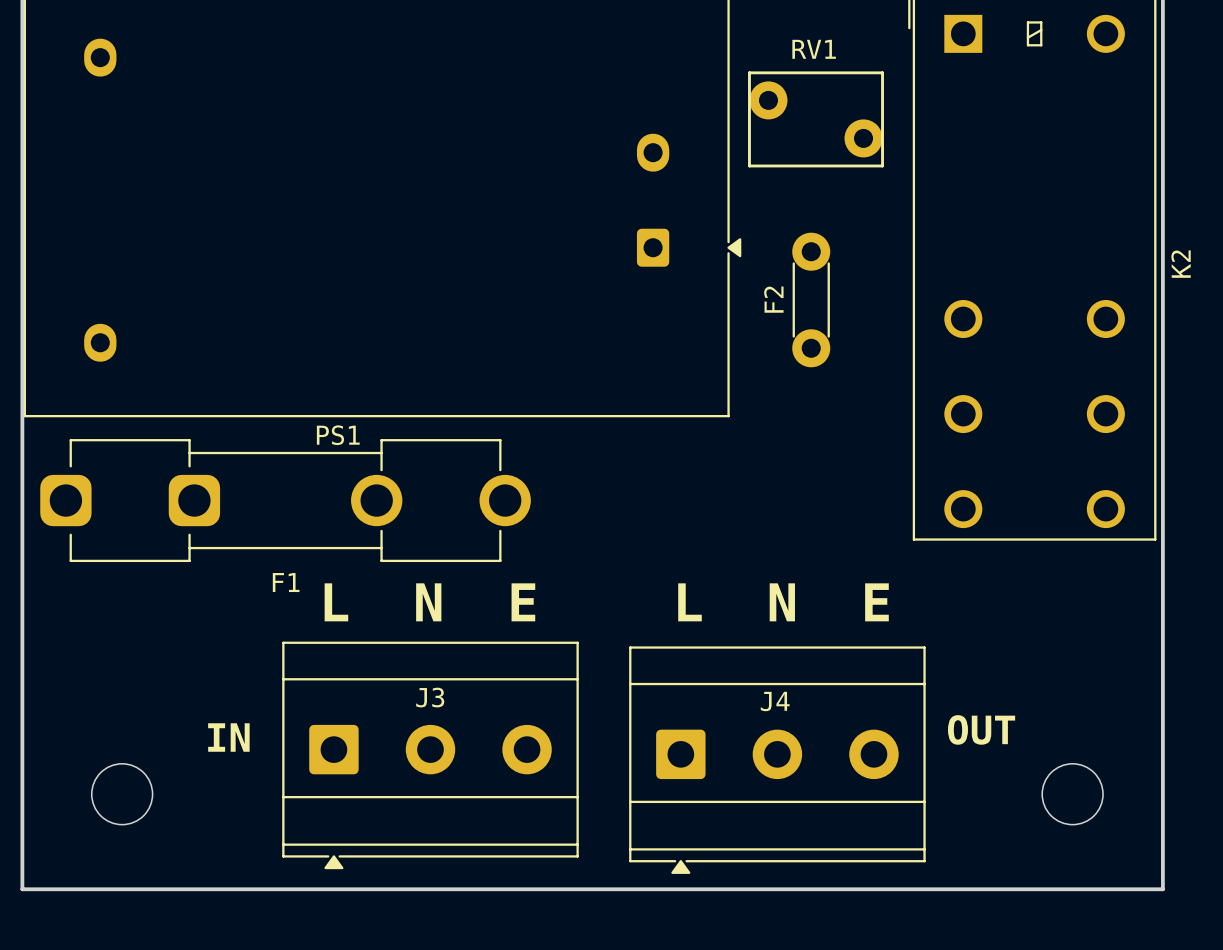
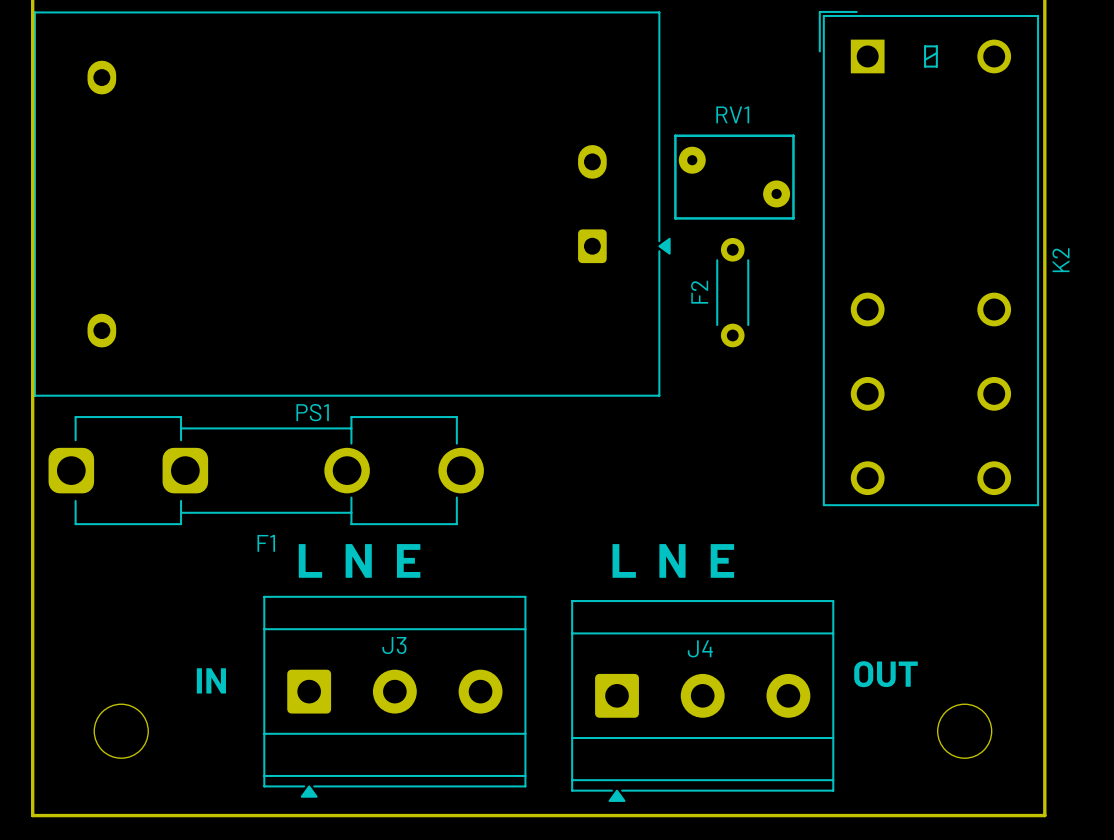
RV1 footprint: [748, 71, 884, 168] -> [674, 134, 795, 220]
F2 footprint: [792, 232, 831, 368] -> [716, 237, 750, 348]

